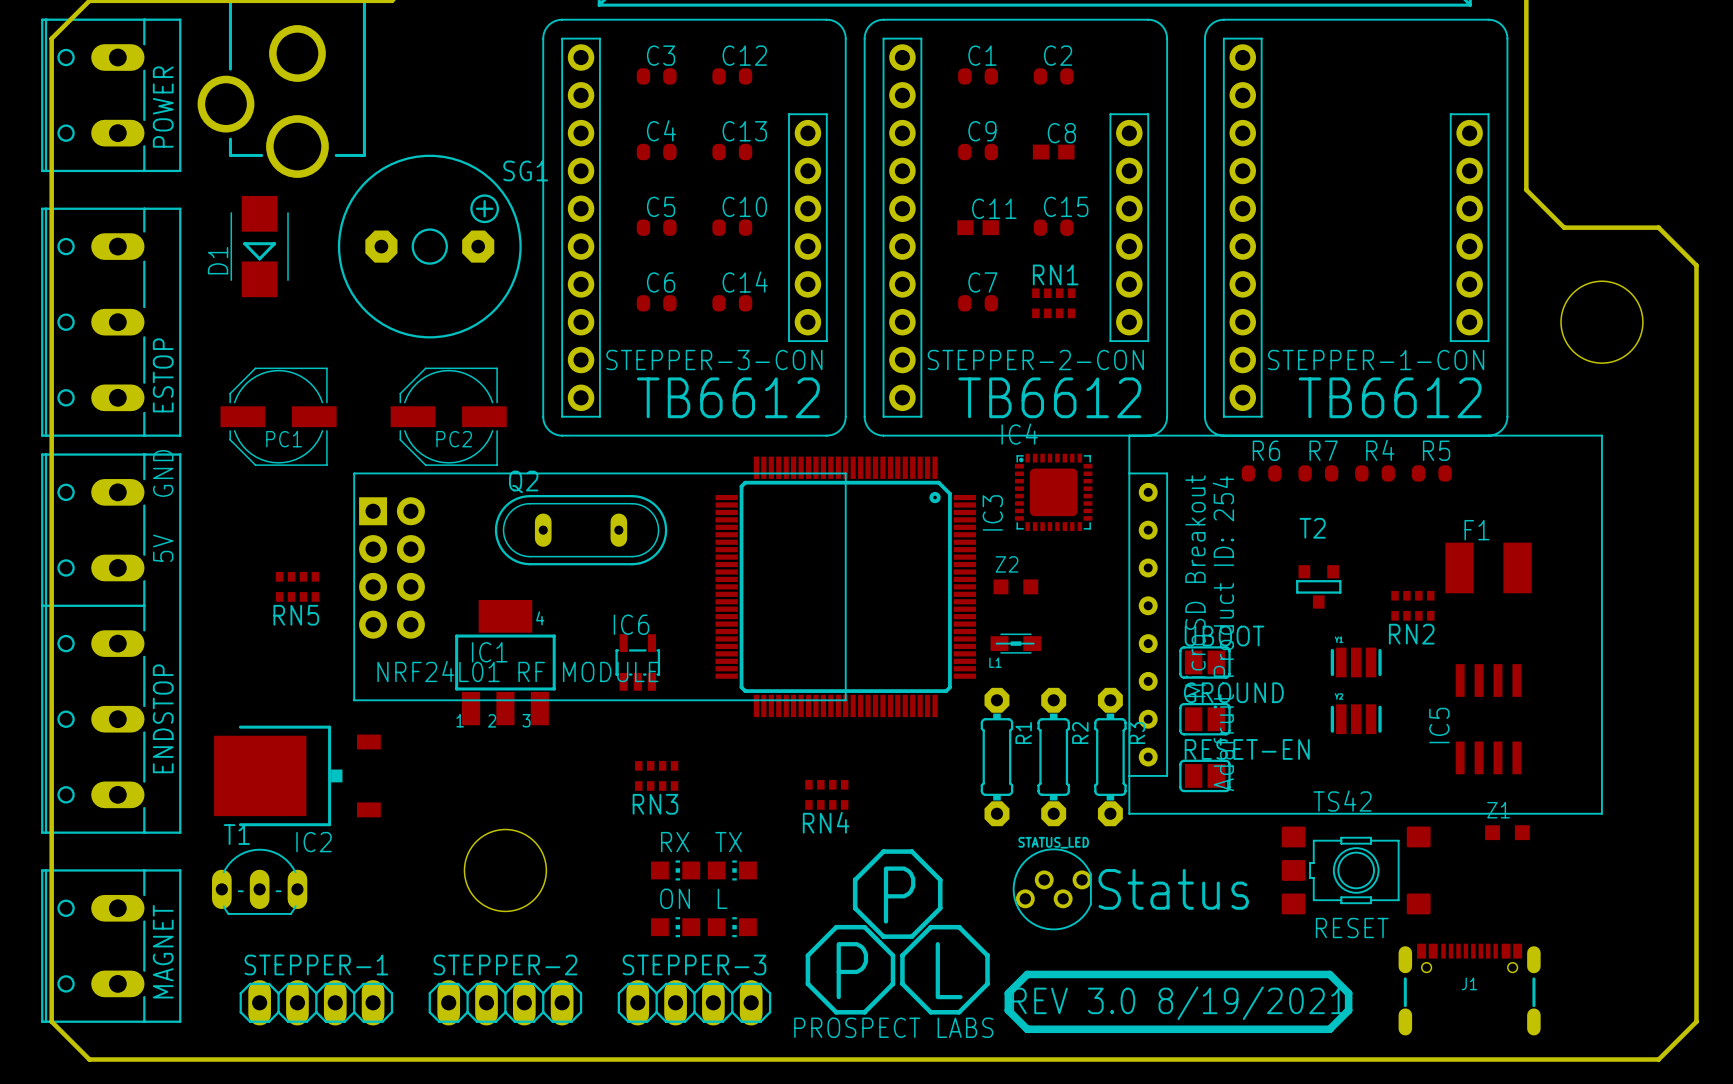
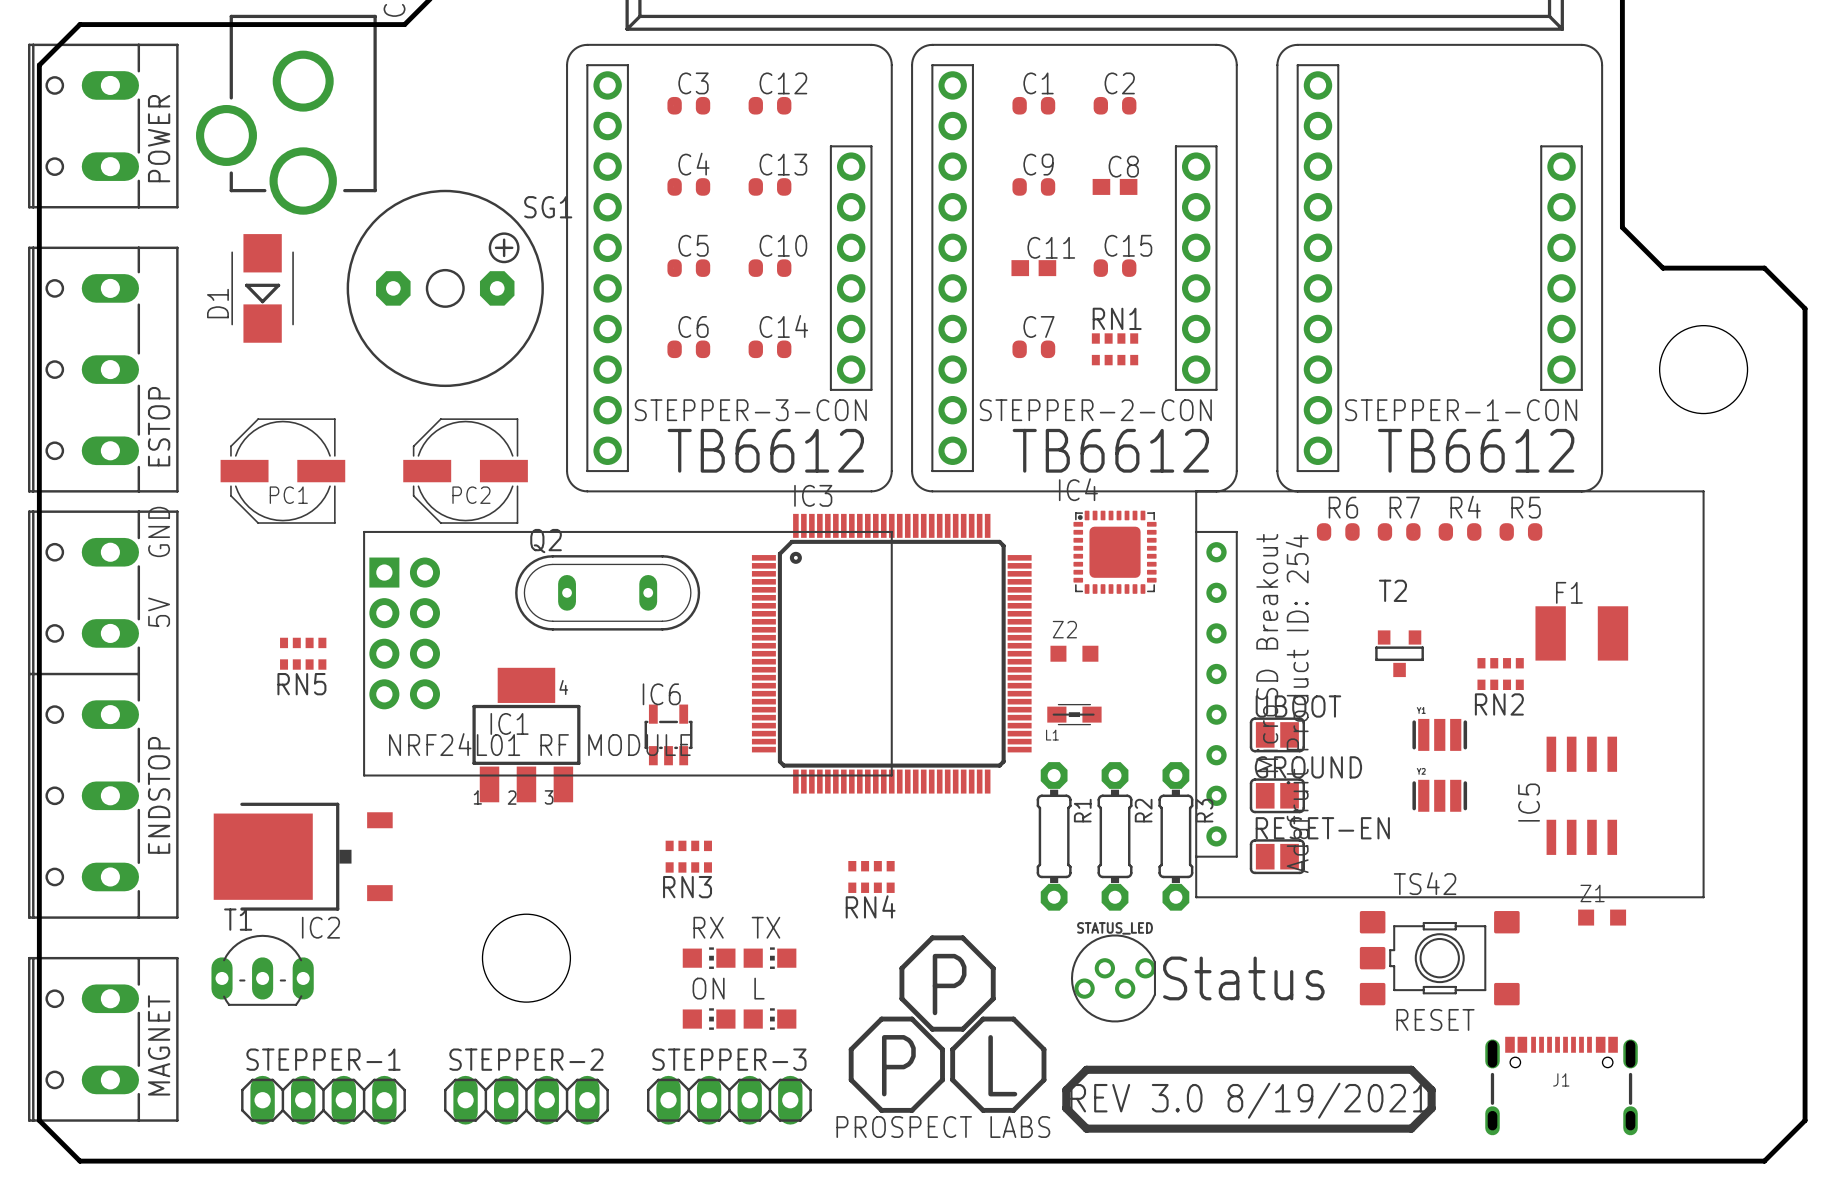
IC3 rotation: 0° (845, 586) -> 90° counterclockwise (891, 653)

